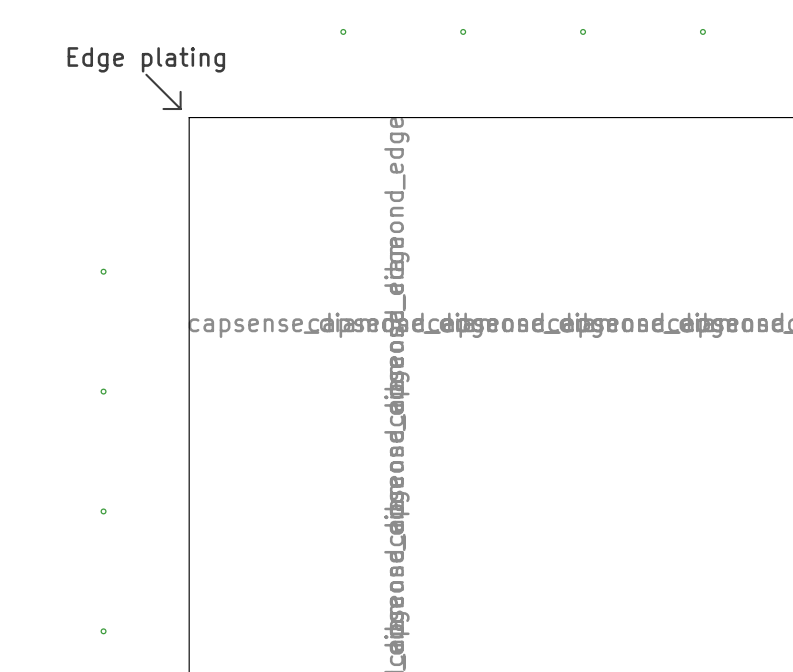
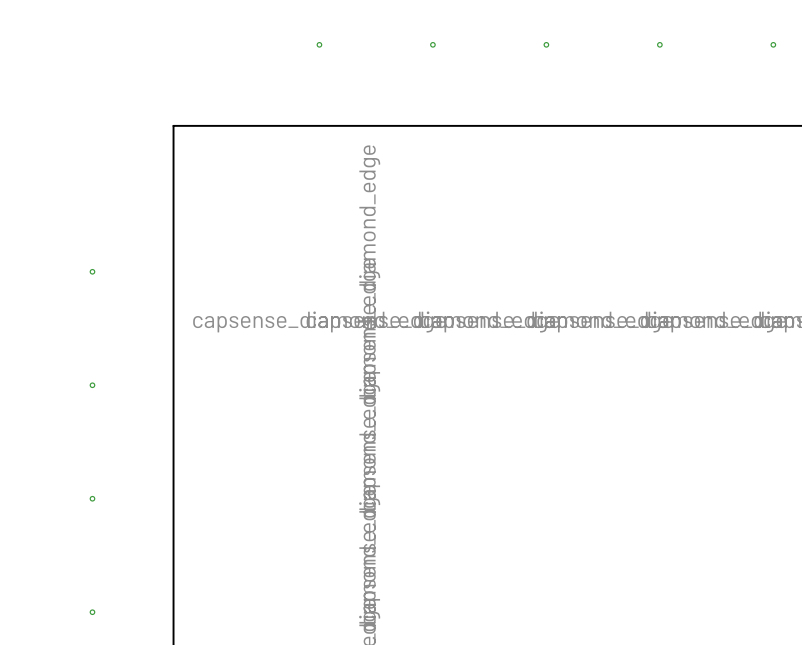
text: Edge plating (146, 59) -> none
line: (146, 74) (180, 109) -> none
line: (180, 91) (180, 109) -> none
line: (163, 109) (180, 109) -> none

